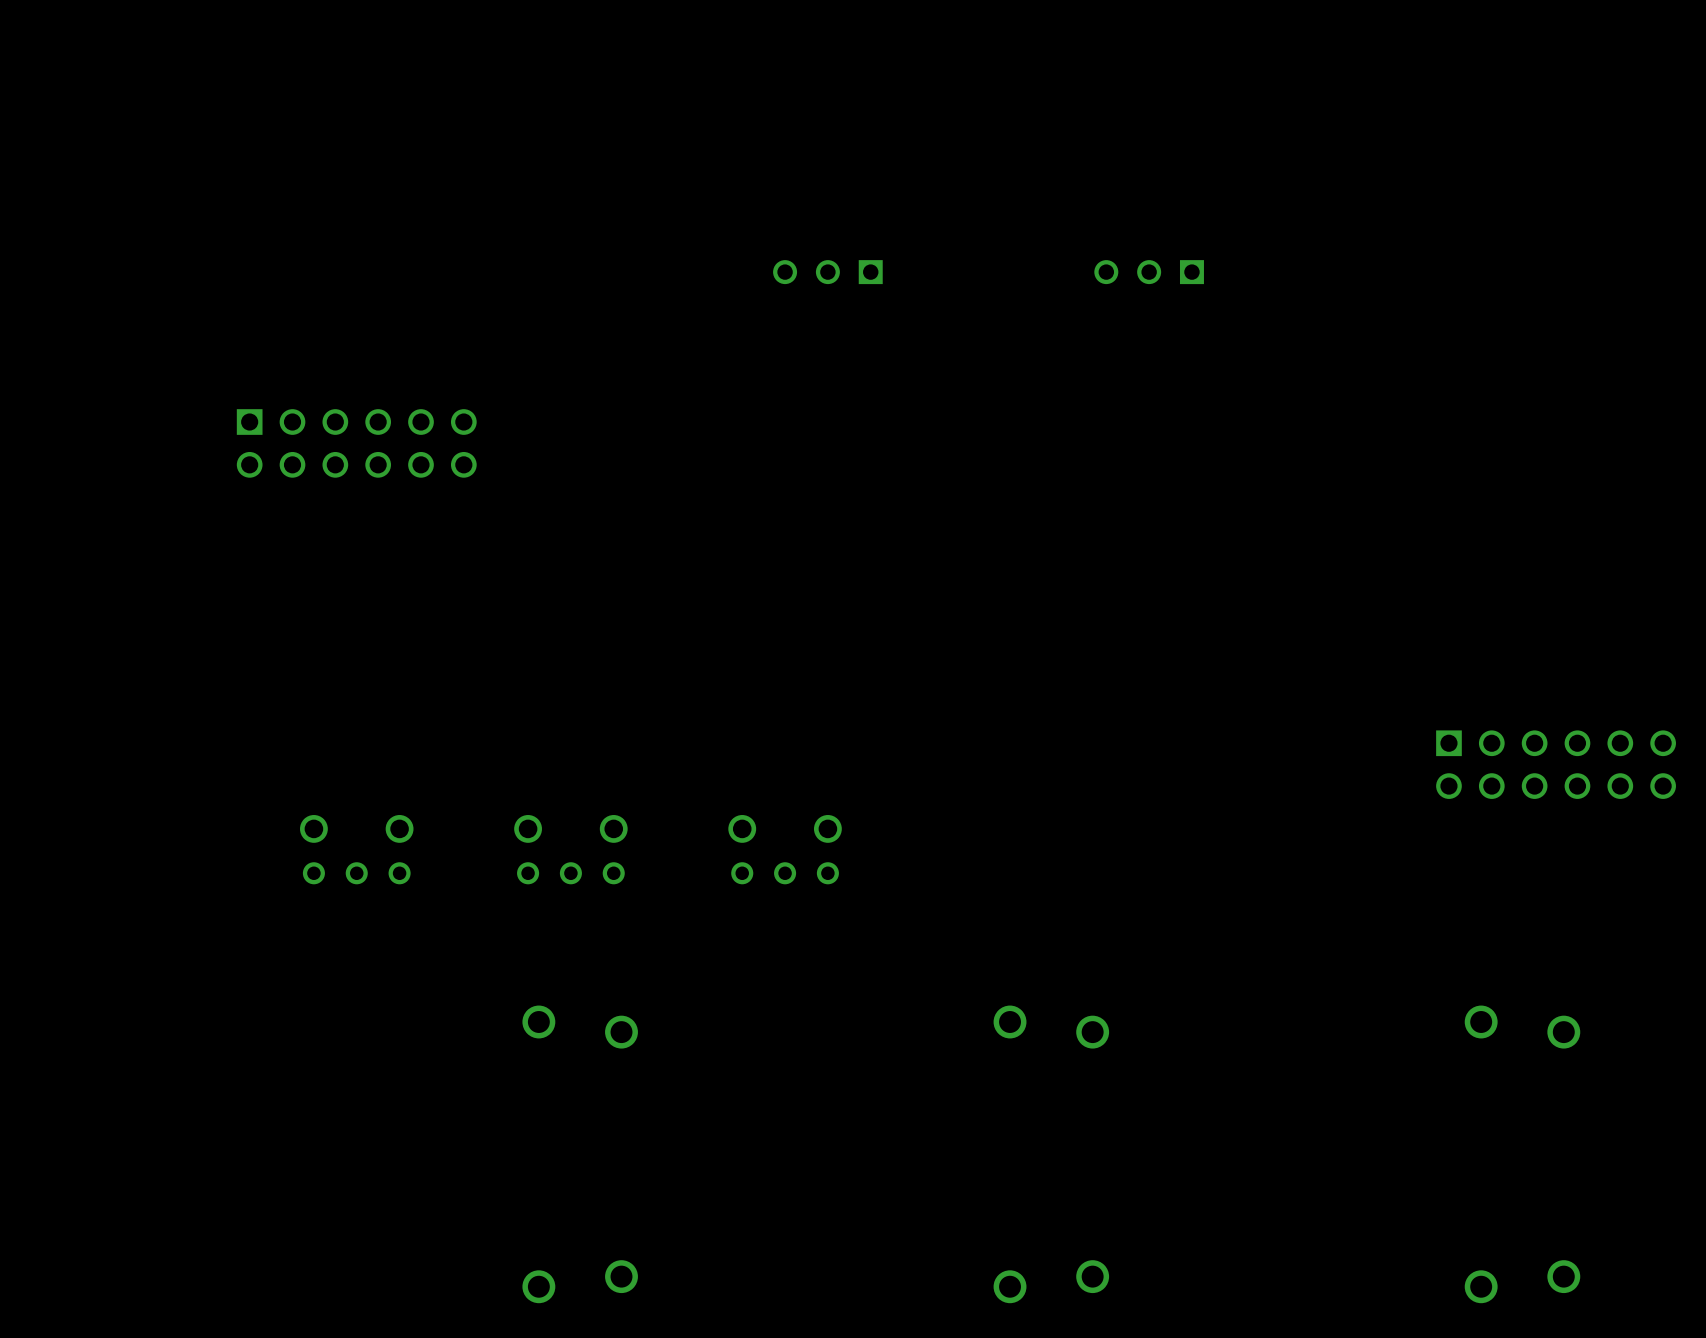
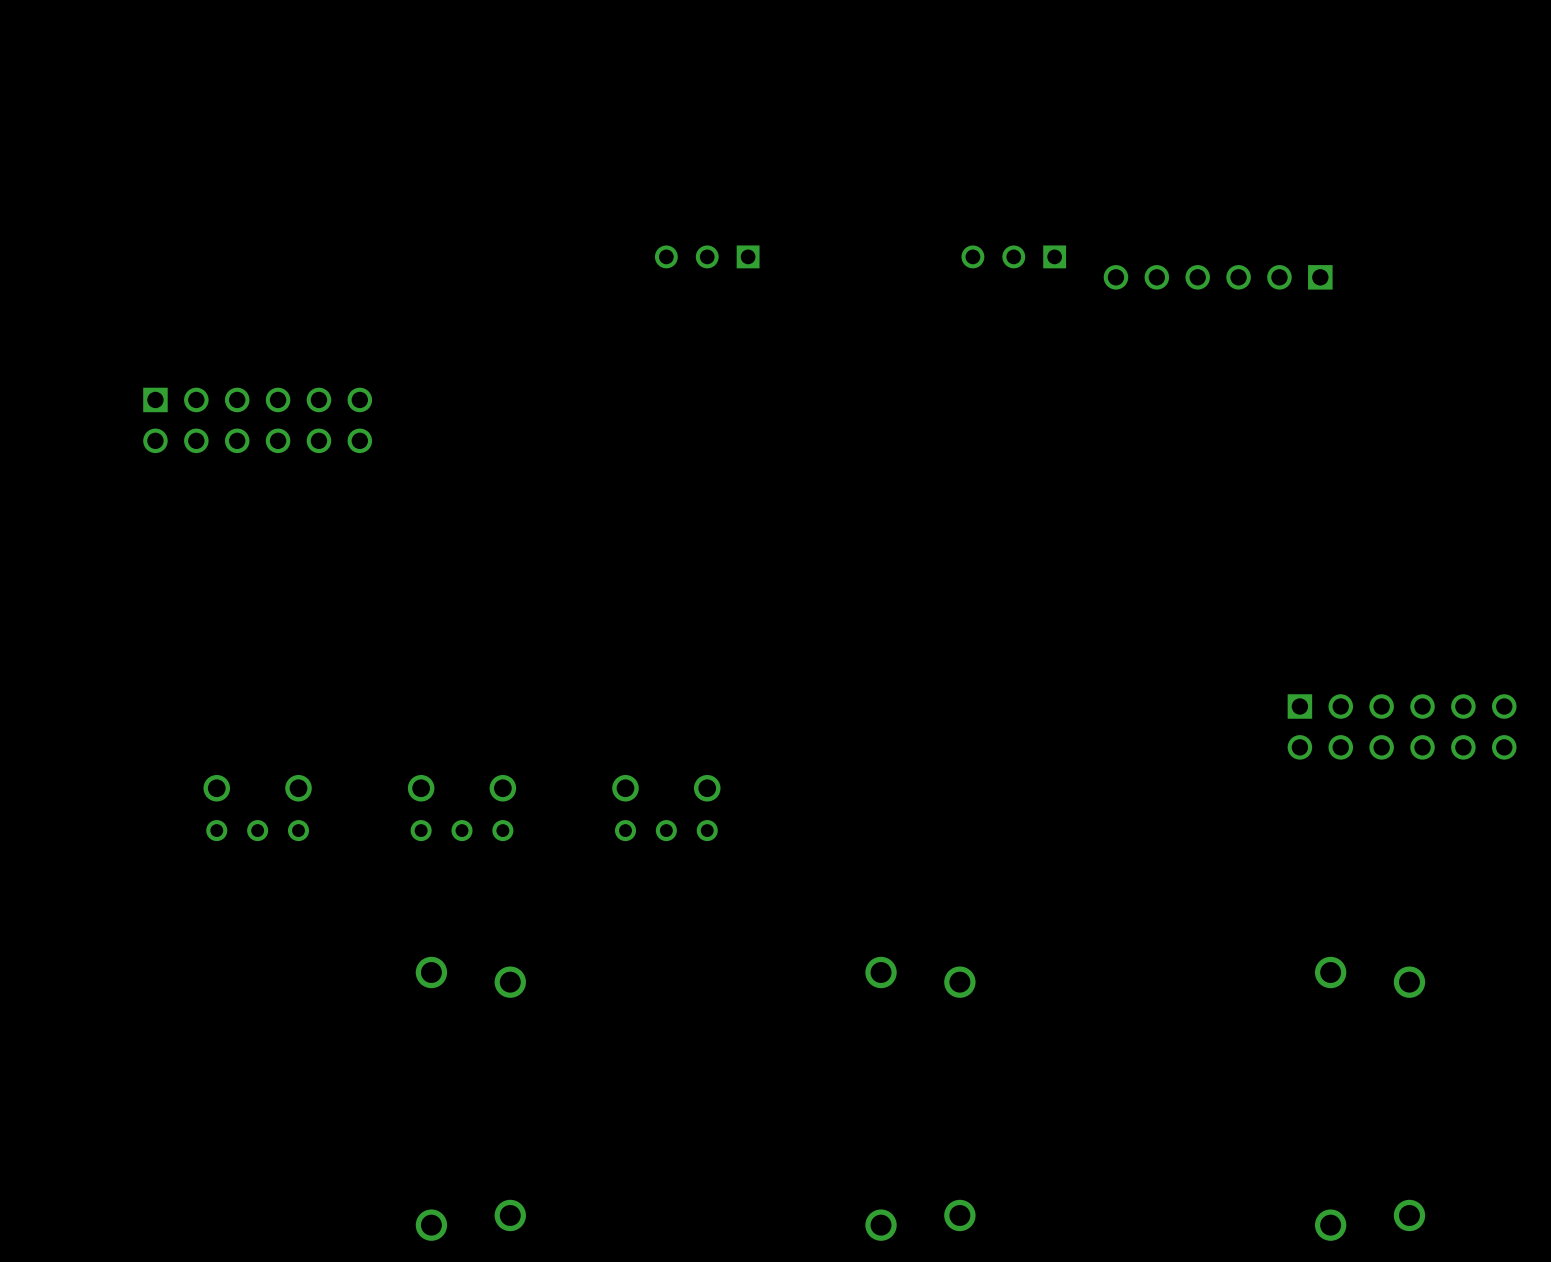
part: none -> (1218, 277)

